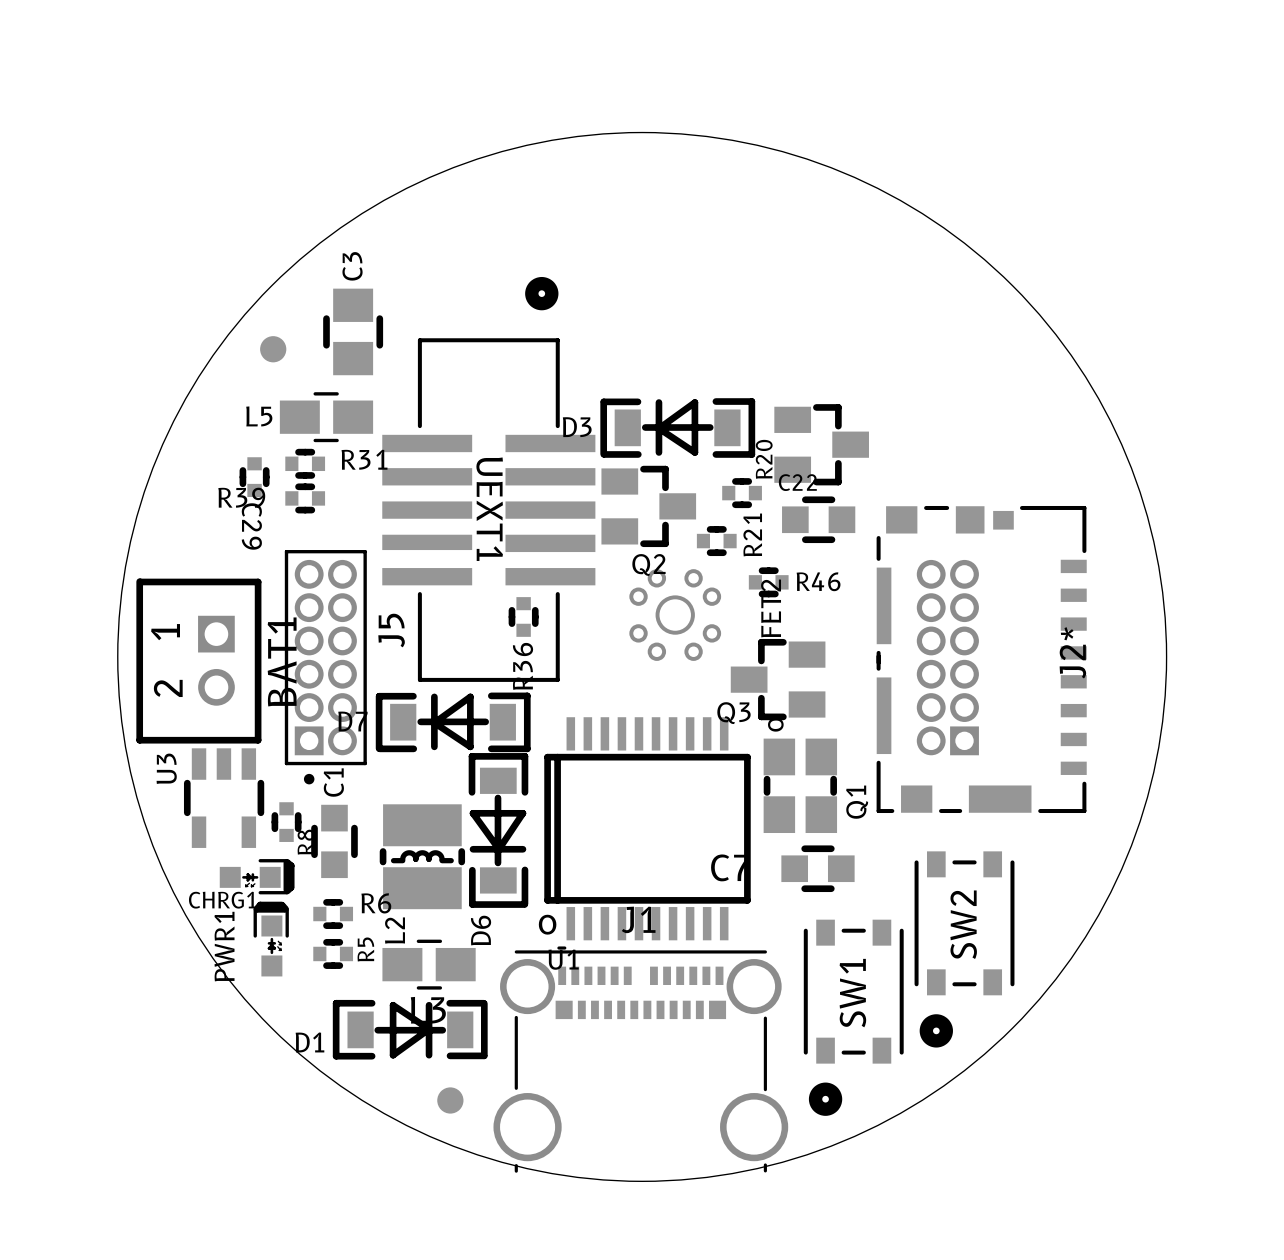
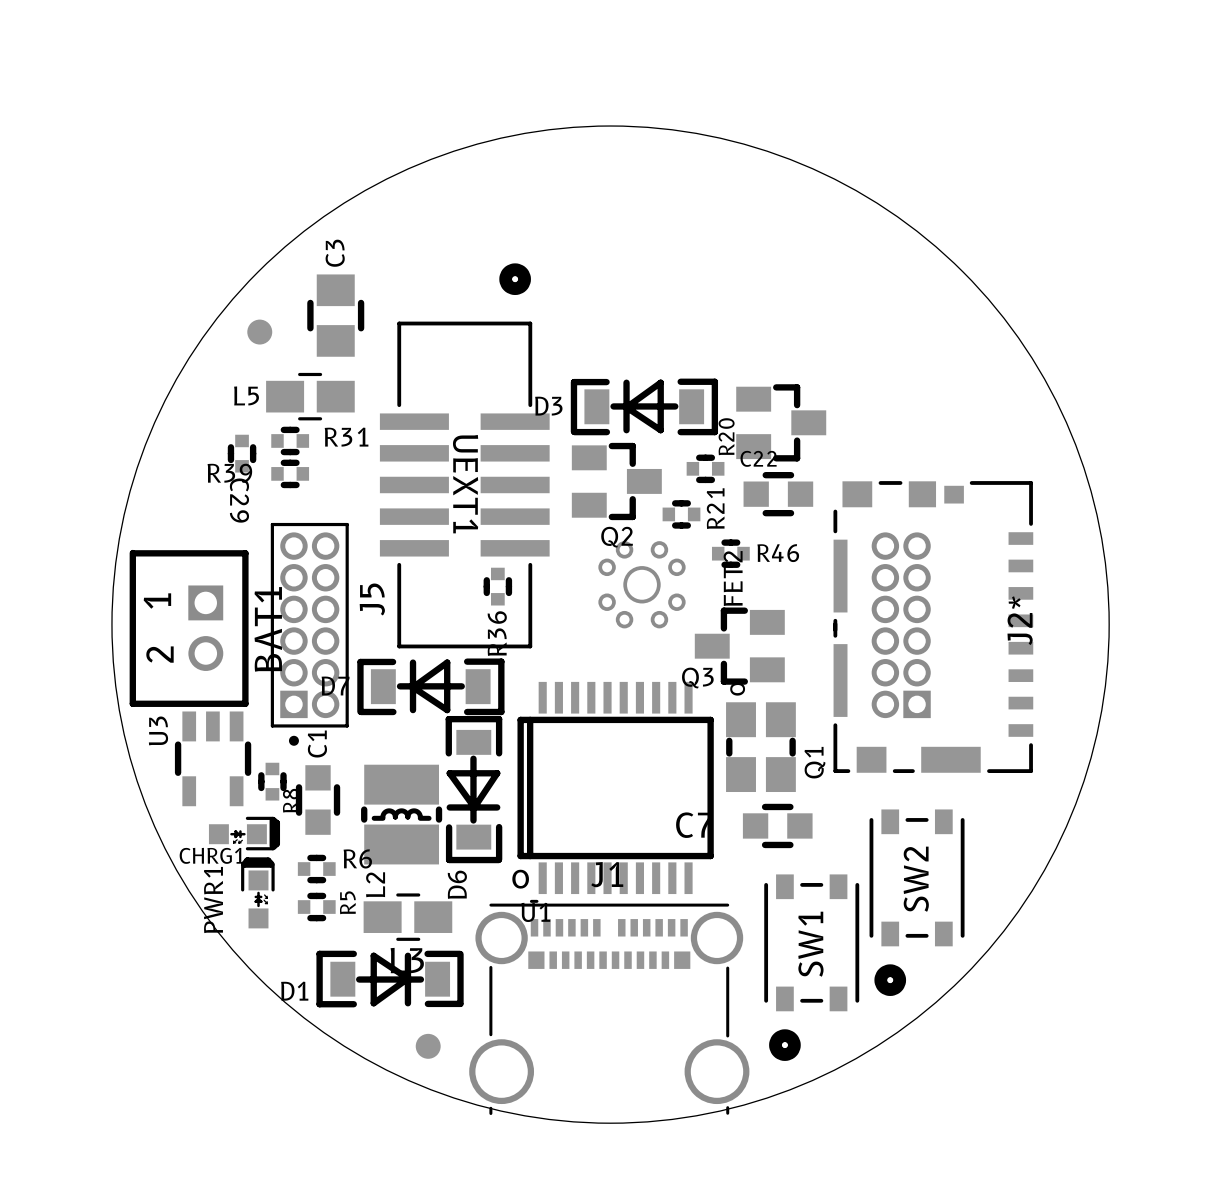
UEXT1 footprint: [382, 276, 596, 682] -> [379, 263, 550, 649]

